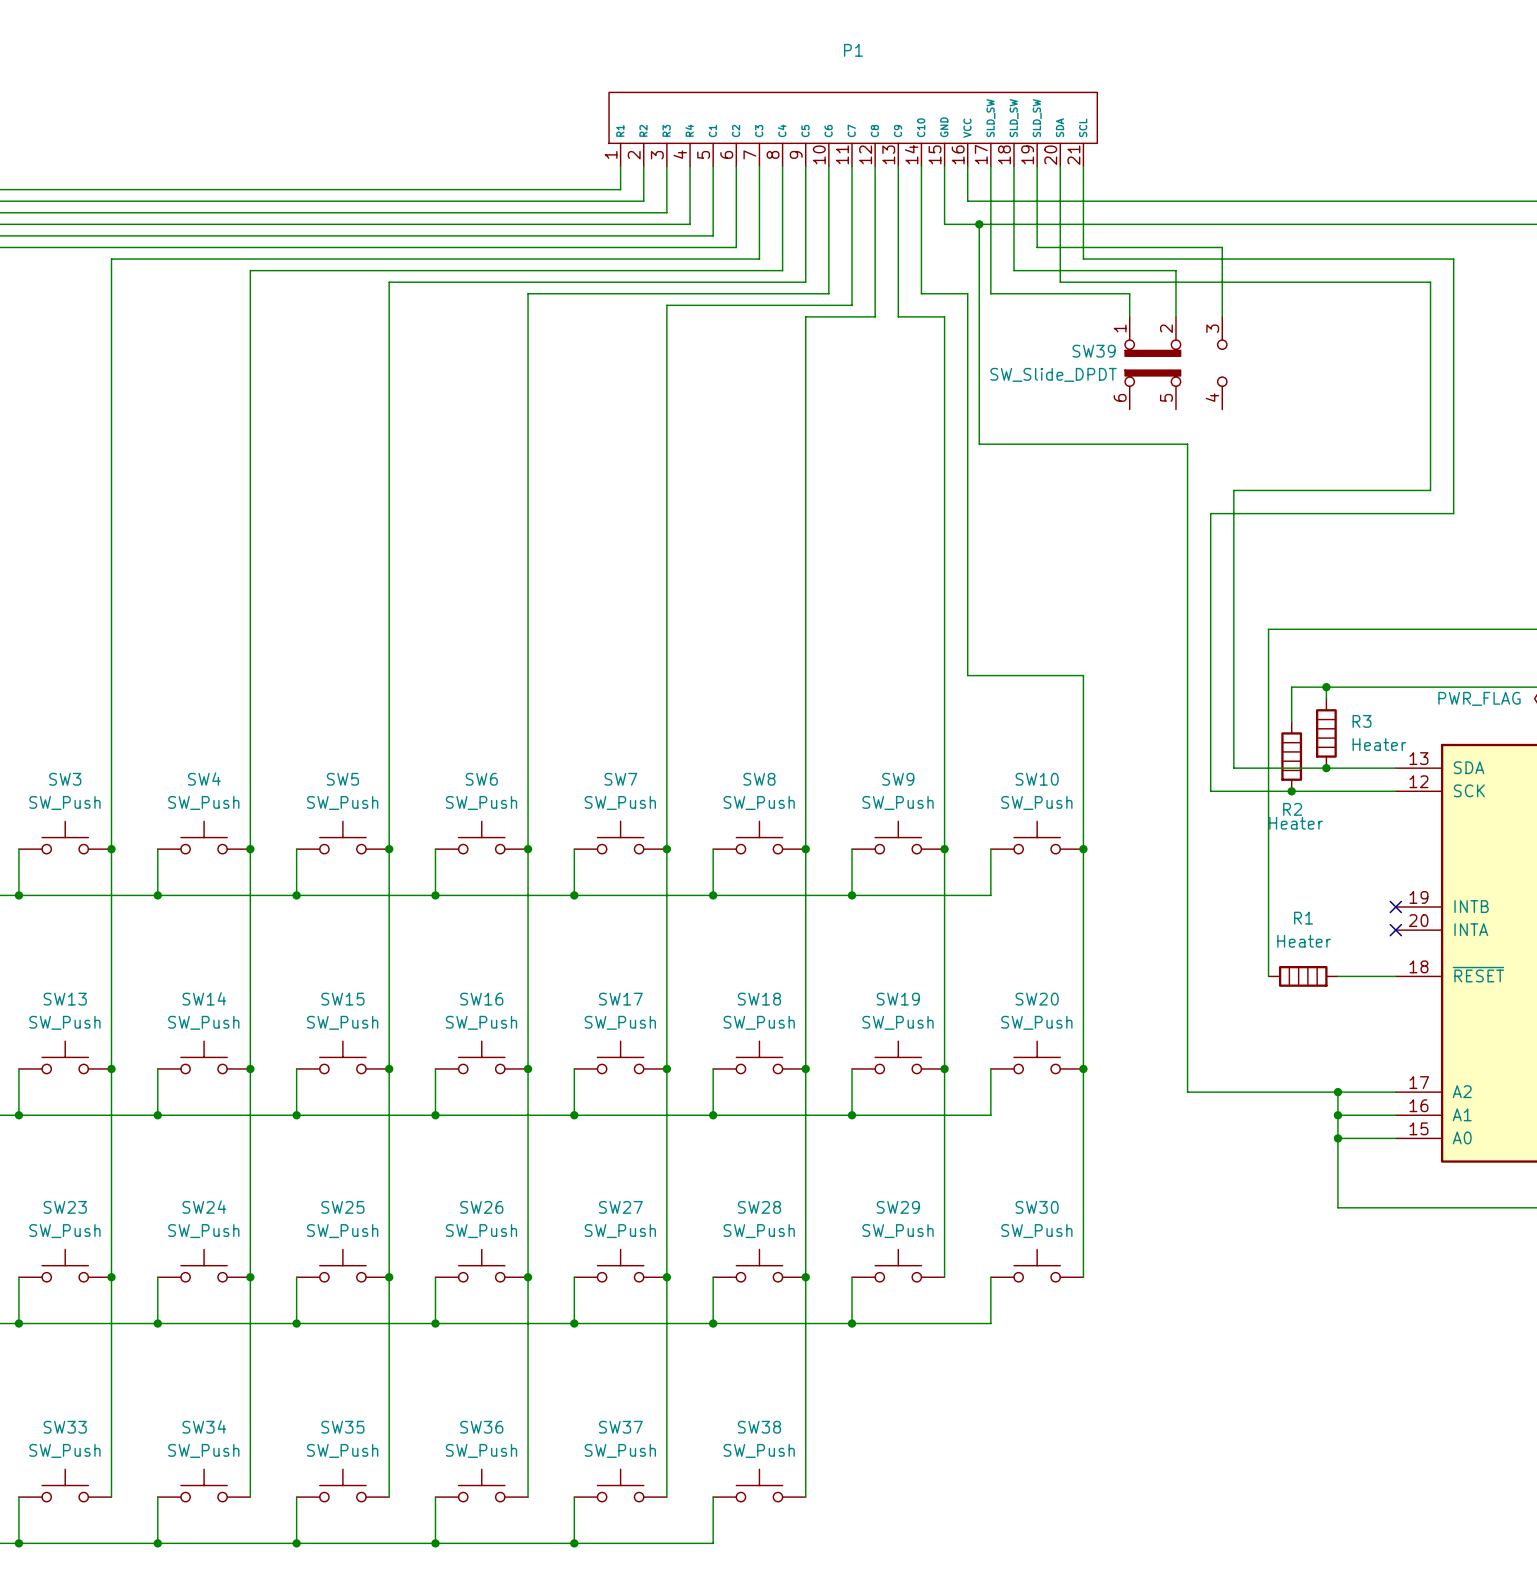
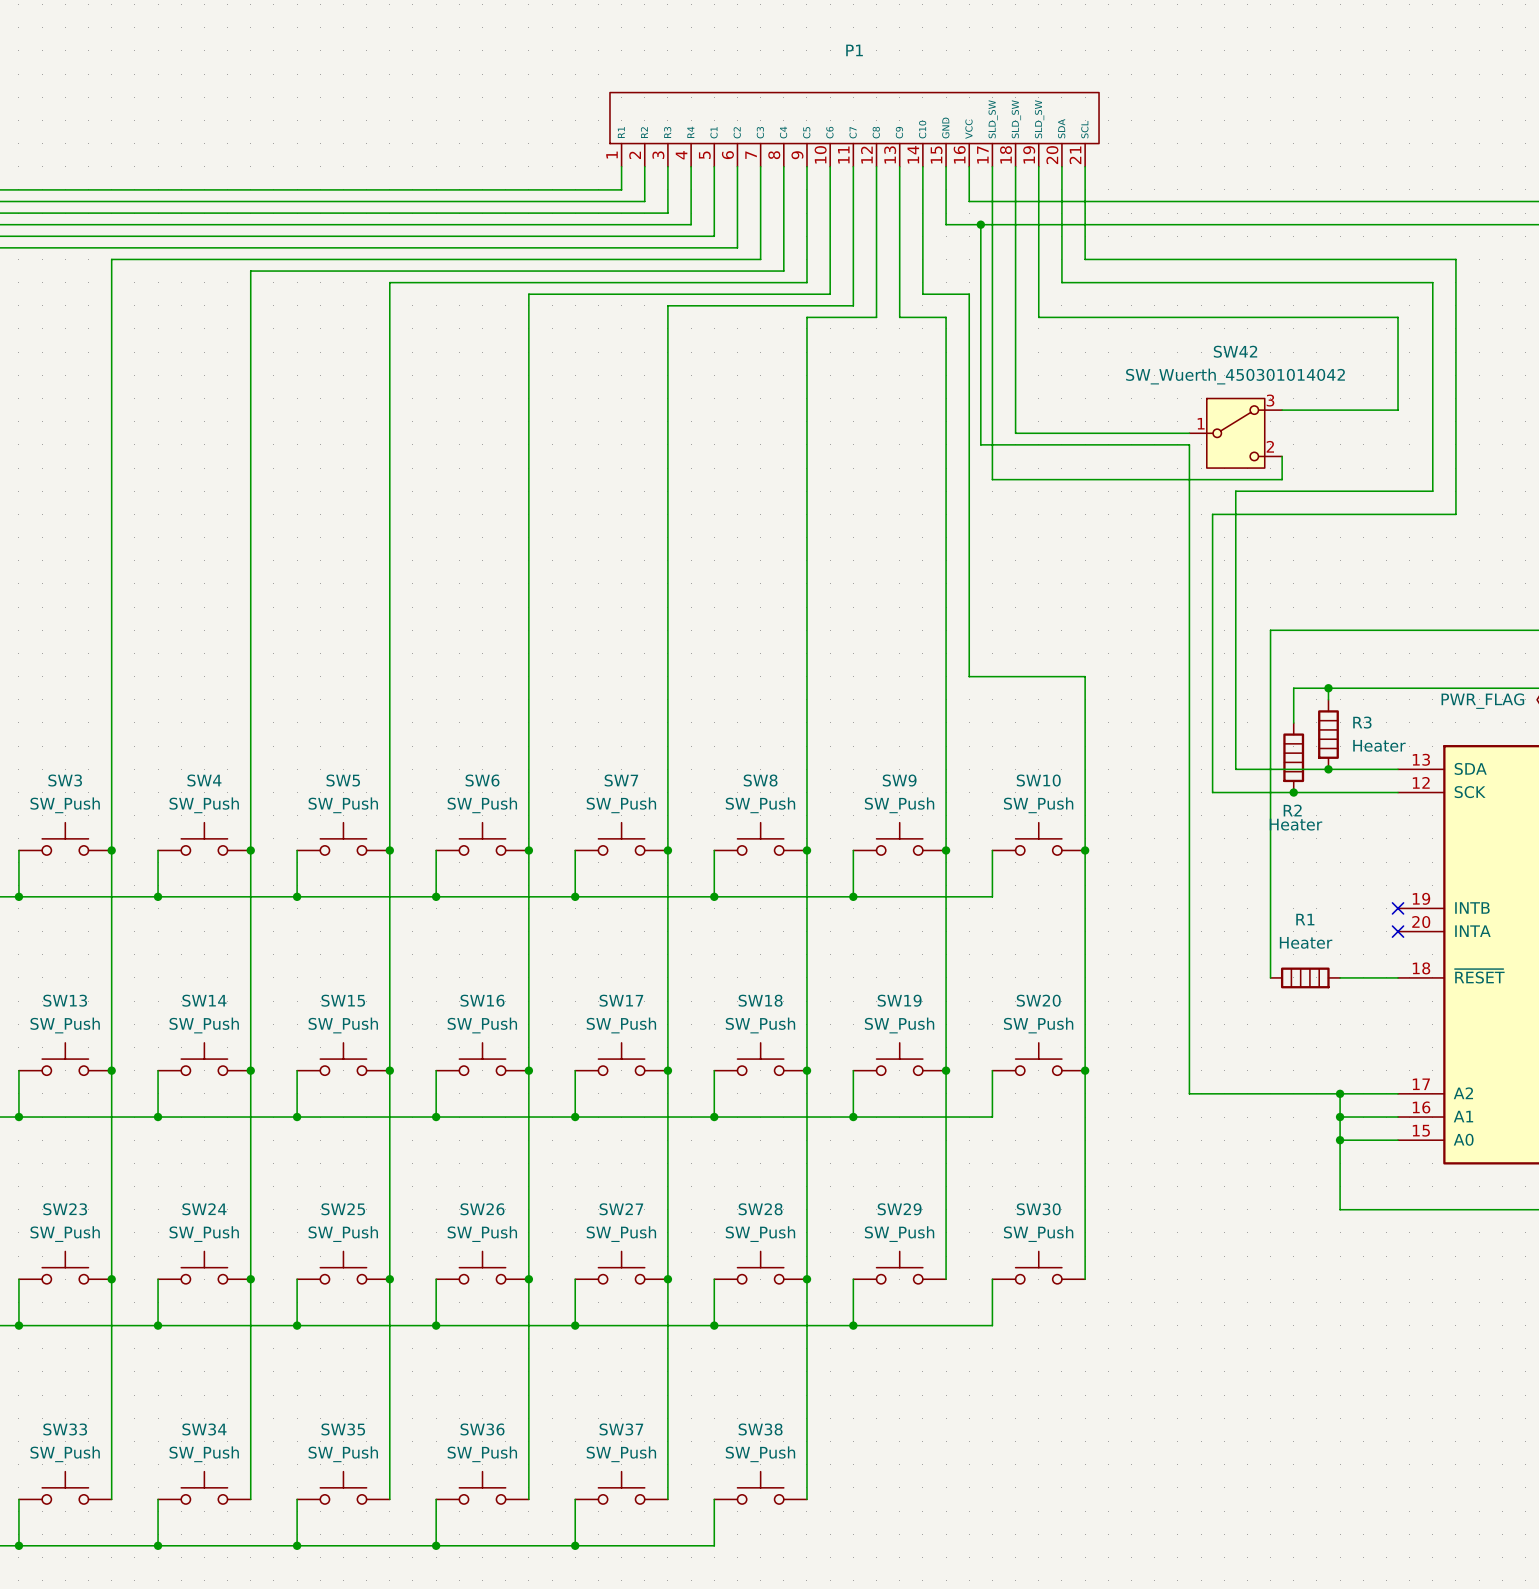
wire: (1037, 247) (1222, 247) (1222, 316) -> (1038, 247) (1038, 317) (1398, 317) (1398, 410) (1282, 410)
wire: (1014, 270) (1175, 270) (1175, 316) -> (1015, 271) (1015, 433) (1189, 433)
wire: (990, 293) (1129, 293) (1129, 316) -> (992, 294) (992, 479) (1282, 479) (1282, 456)
SW39: SW_Slide_DPDT (1175, 363) -> none
SW42: none -> SW_Wuerth_450301014042 (1235, 433)

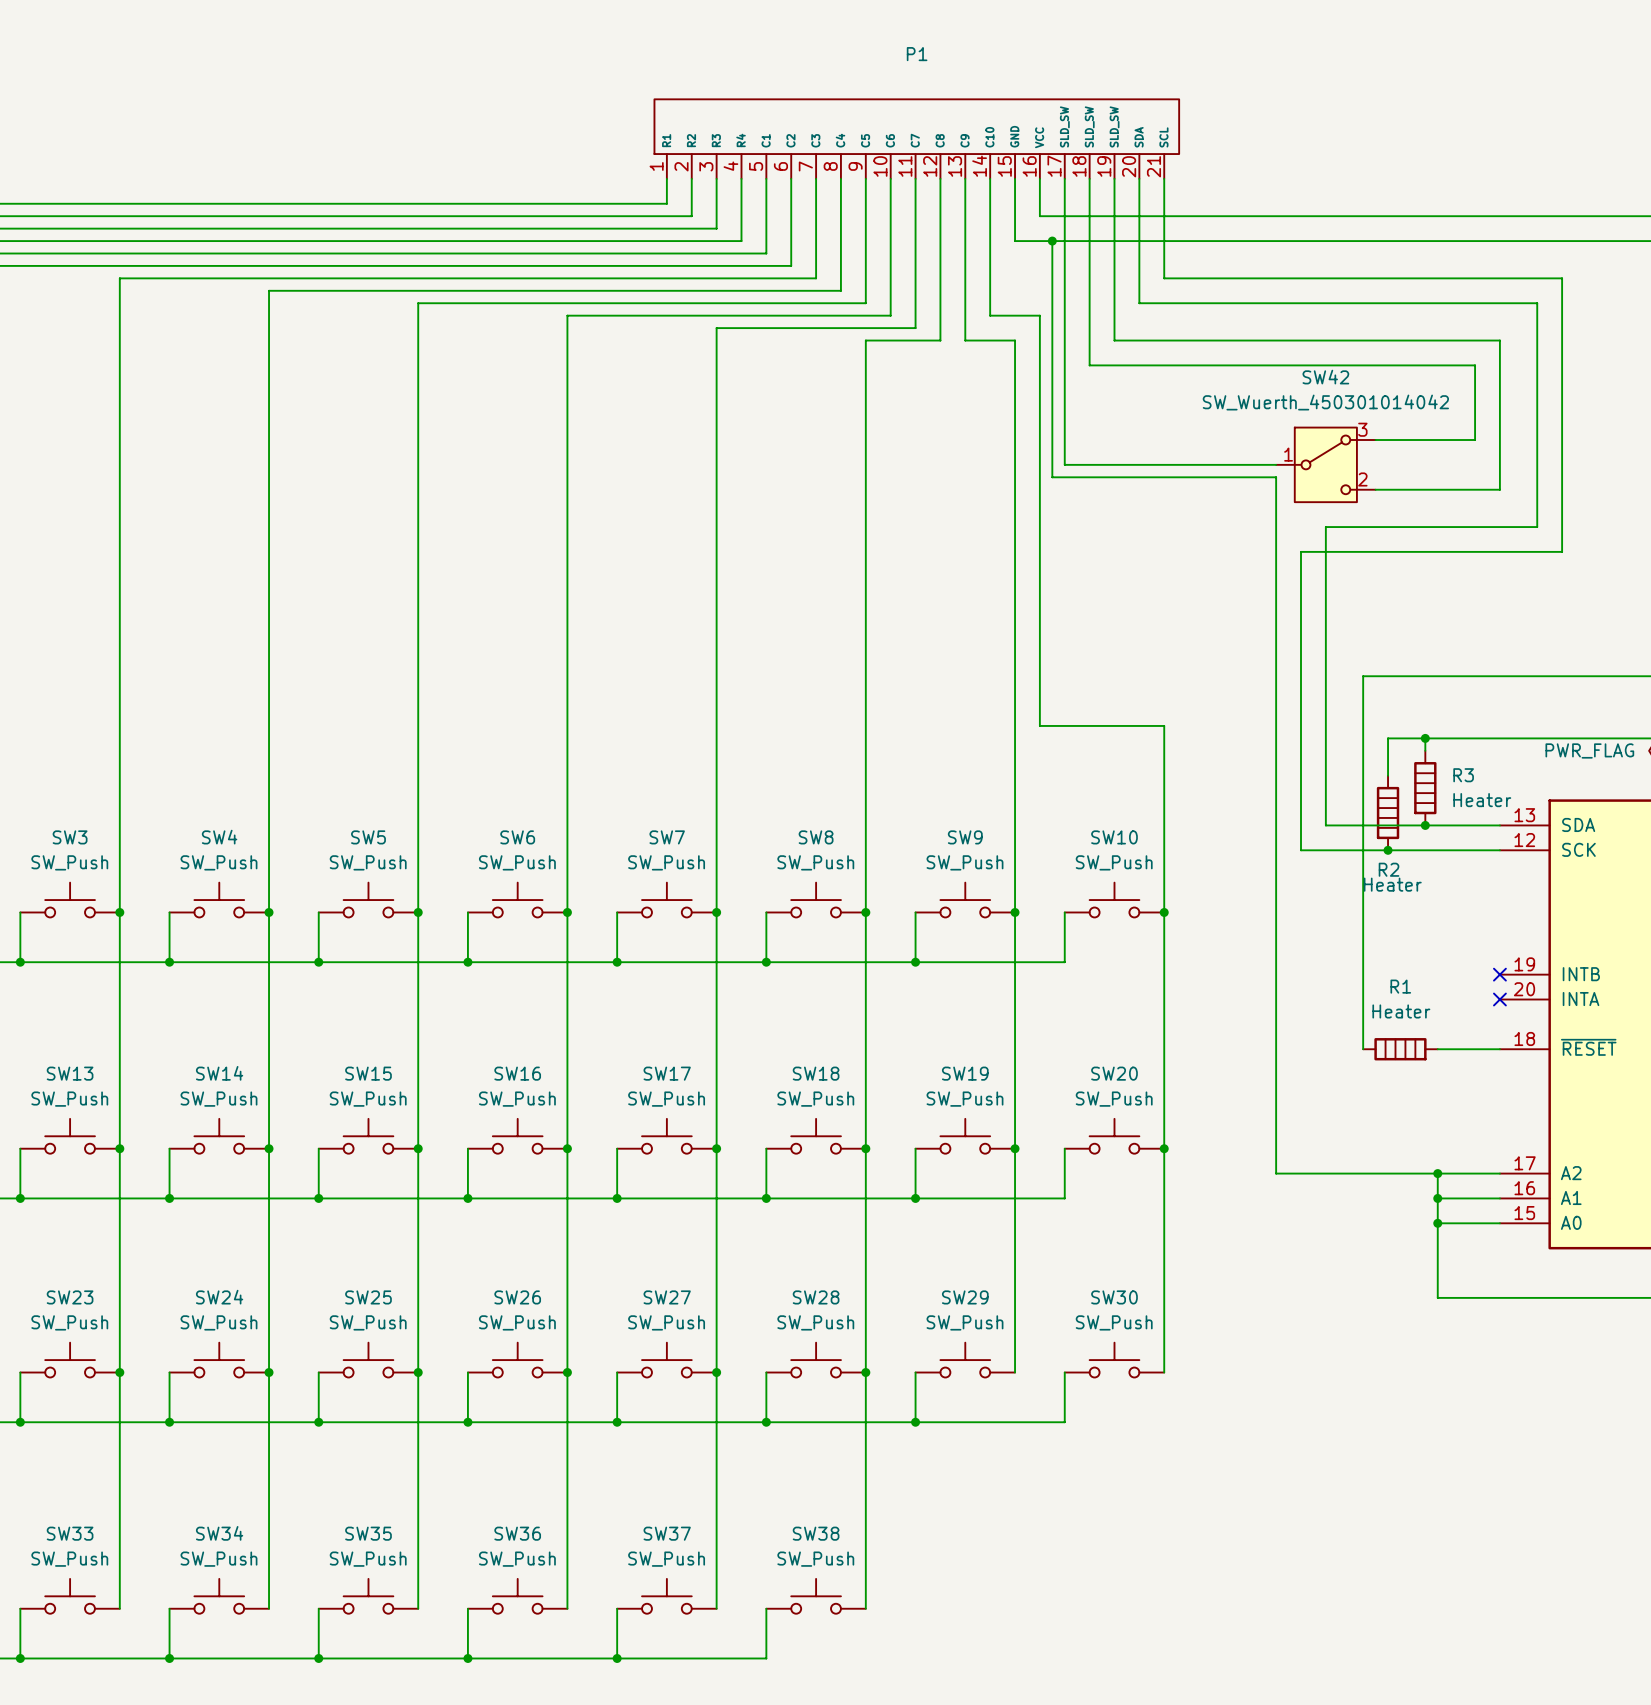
wire: (1015, 340) (1015, 433) -> (1064, 464) (1089, 464)
wire: none -> (1089, 365) (1475, 365) (1475, 440)
wire: (1374, 410) (1398, 410) -> (1375, 489) (1499, 489) (1499, 440)
wire: (992, 433) (992, 479) (1282, 479) (1282, 456) -> none

